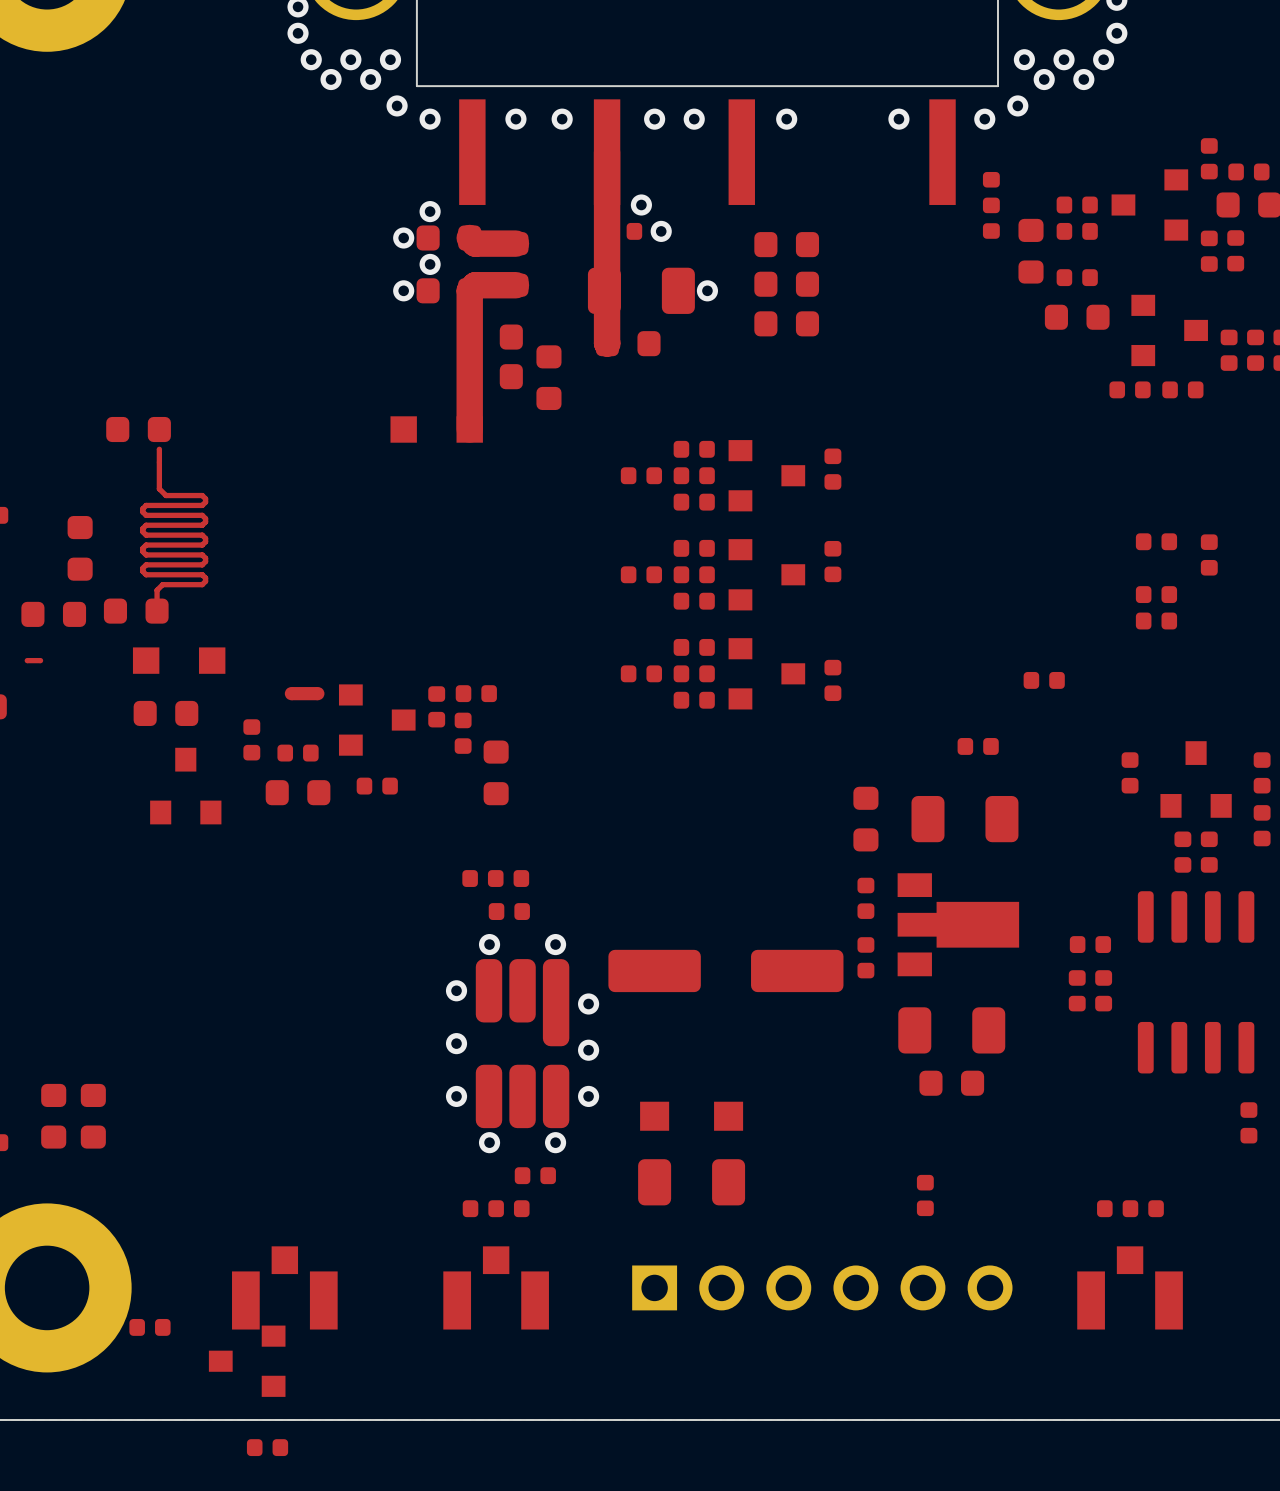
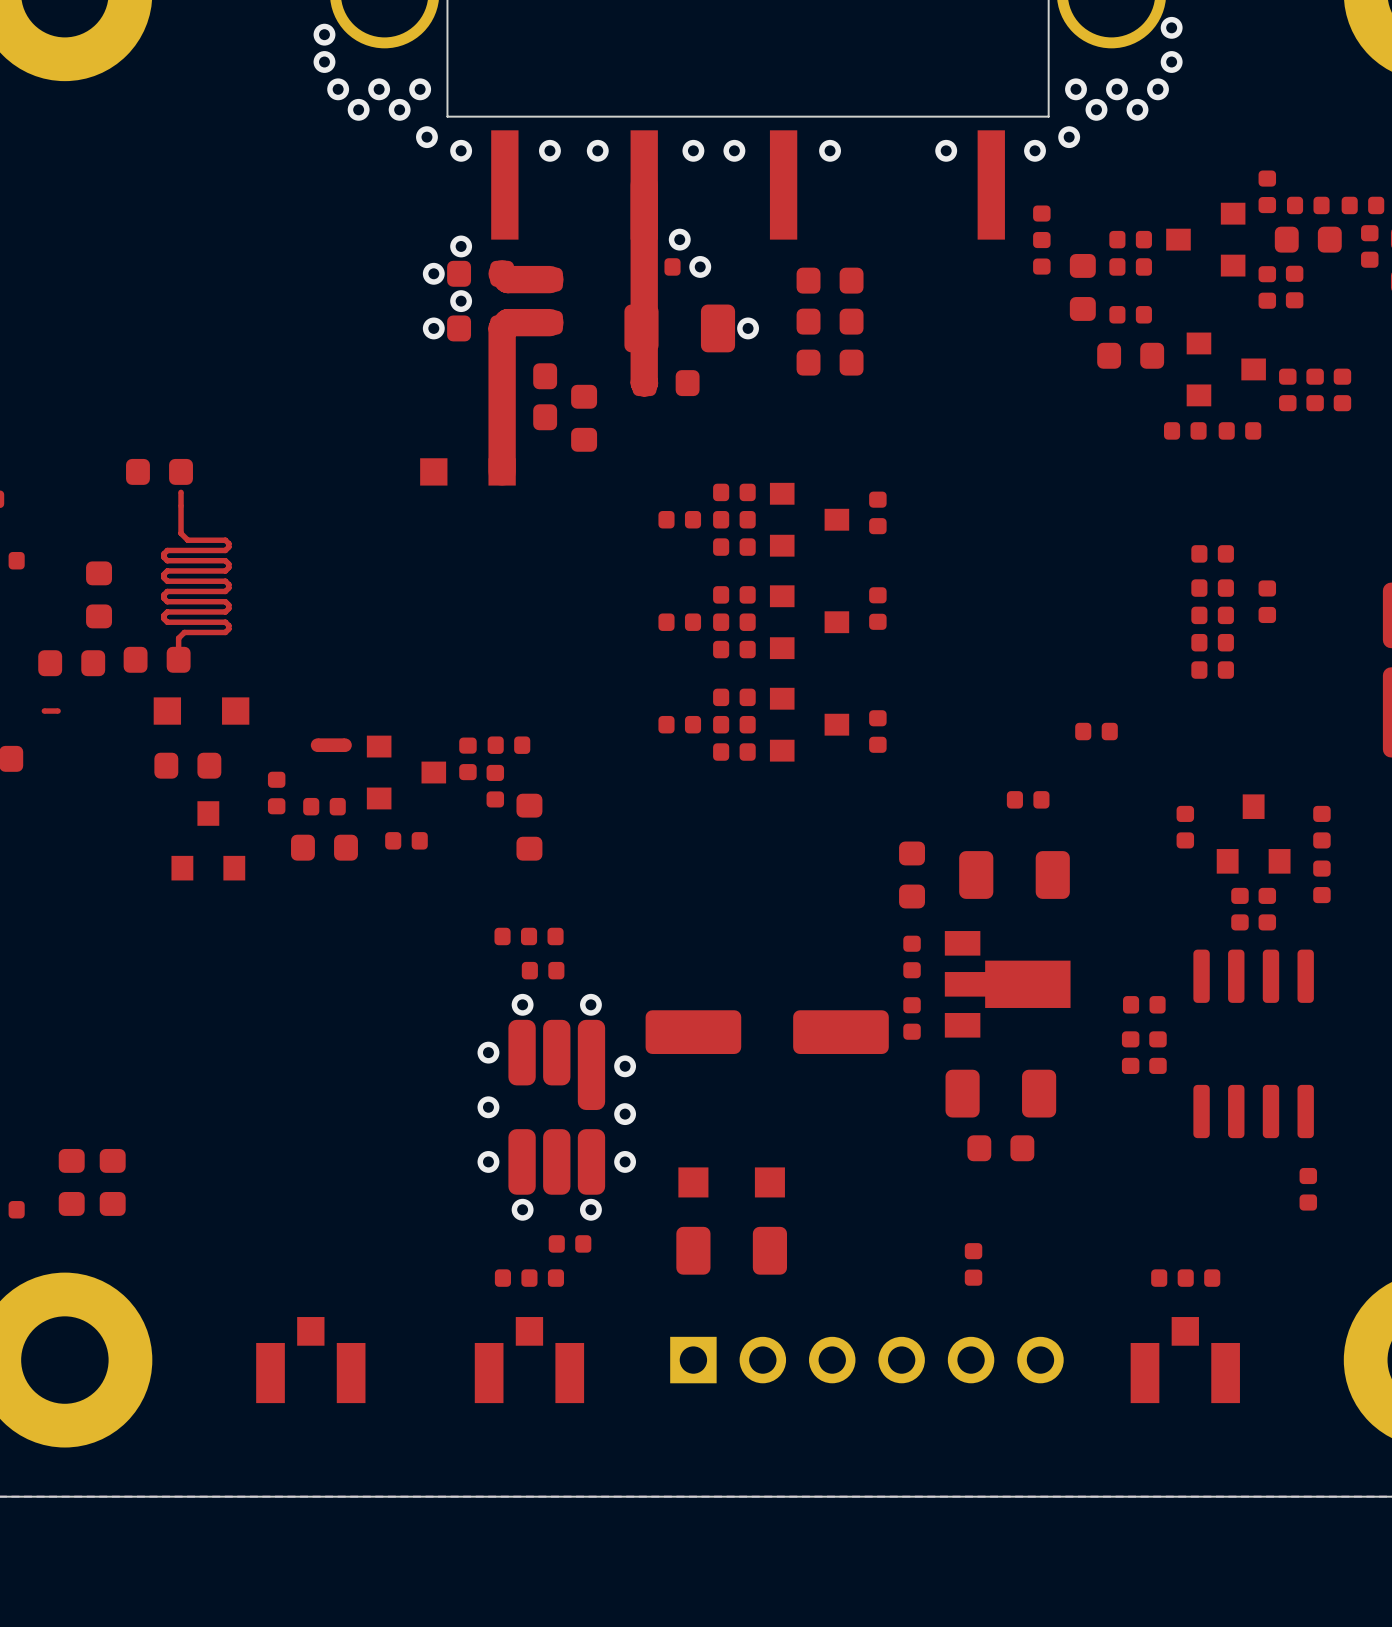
part: none -> (1212, 553)
part: none -> (1212, 615)
part: (149, 1327) -> none
part: (247, 1361) -> none
part: (267, 1447) -> none

